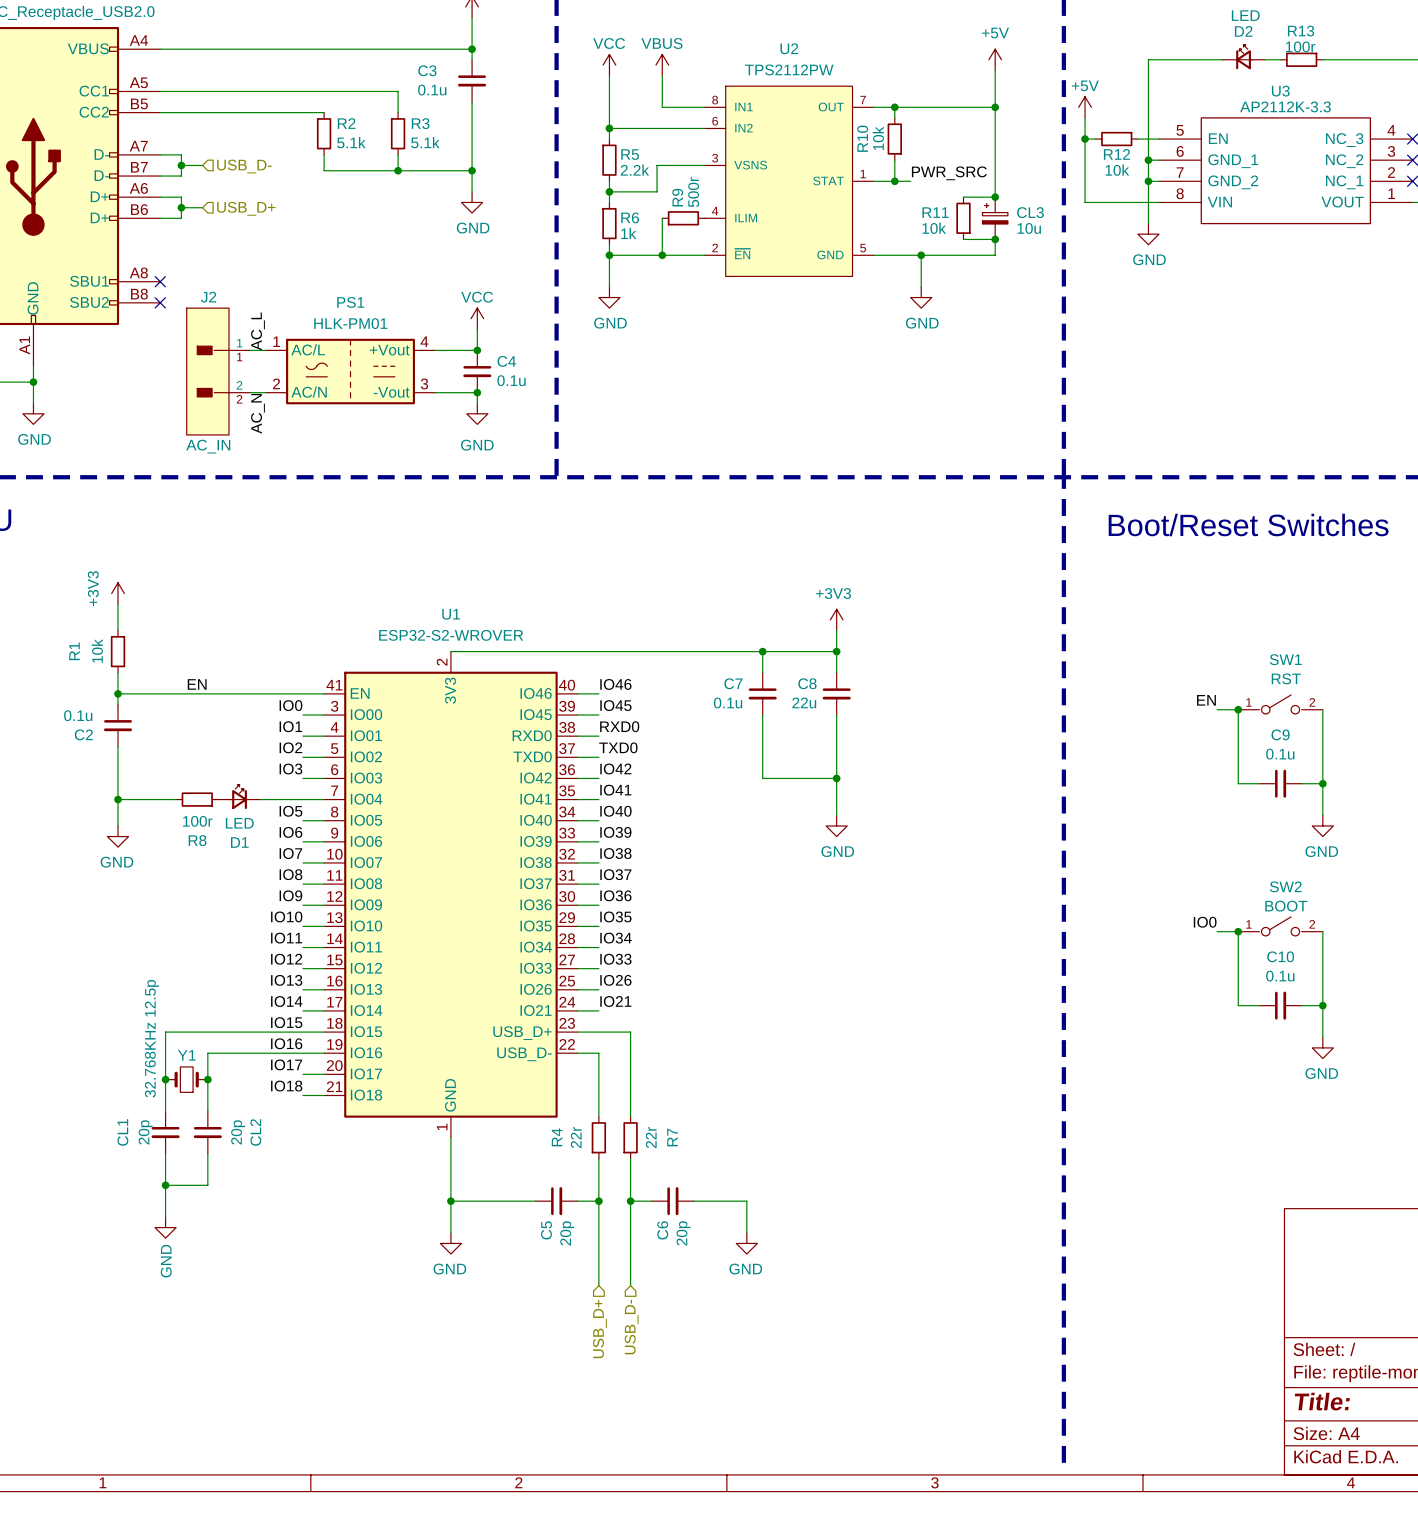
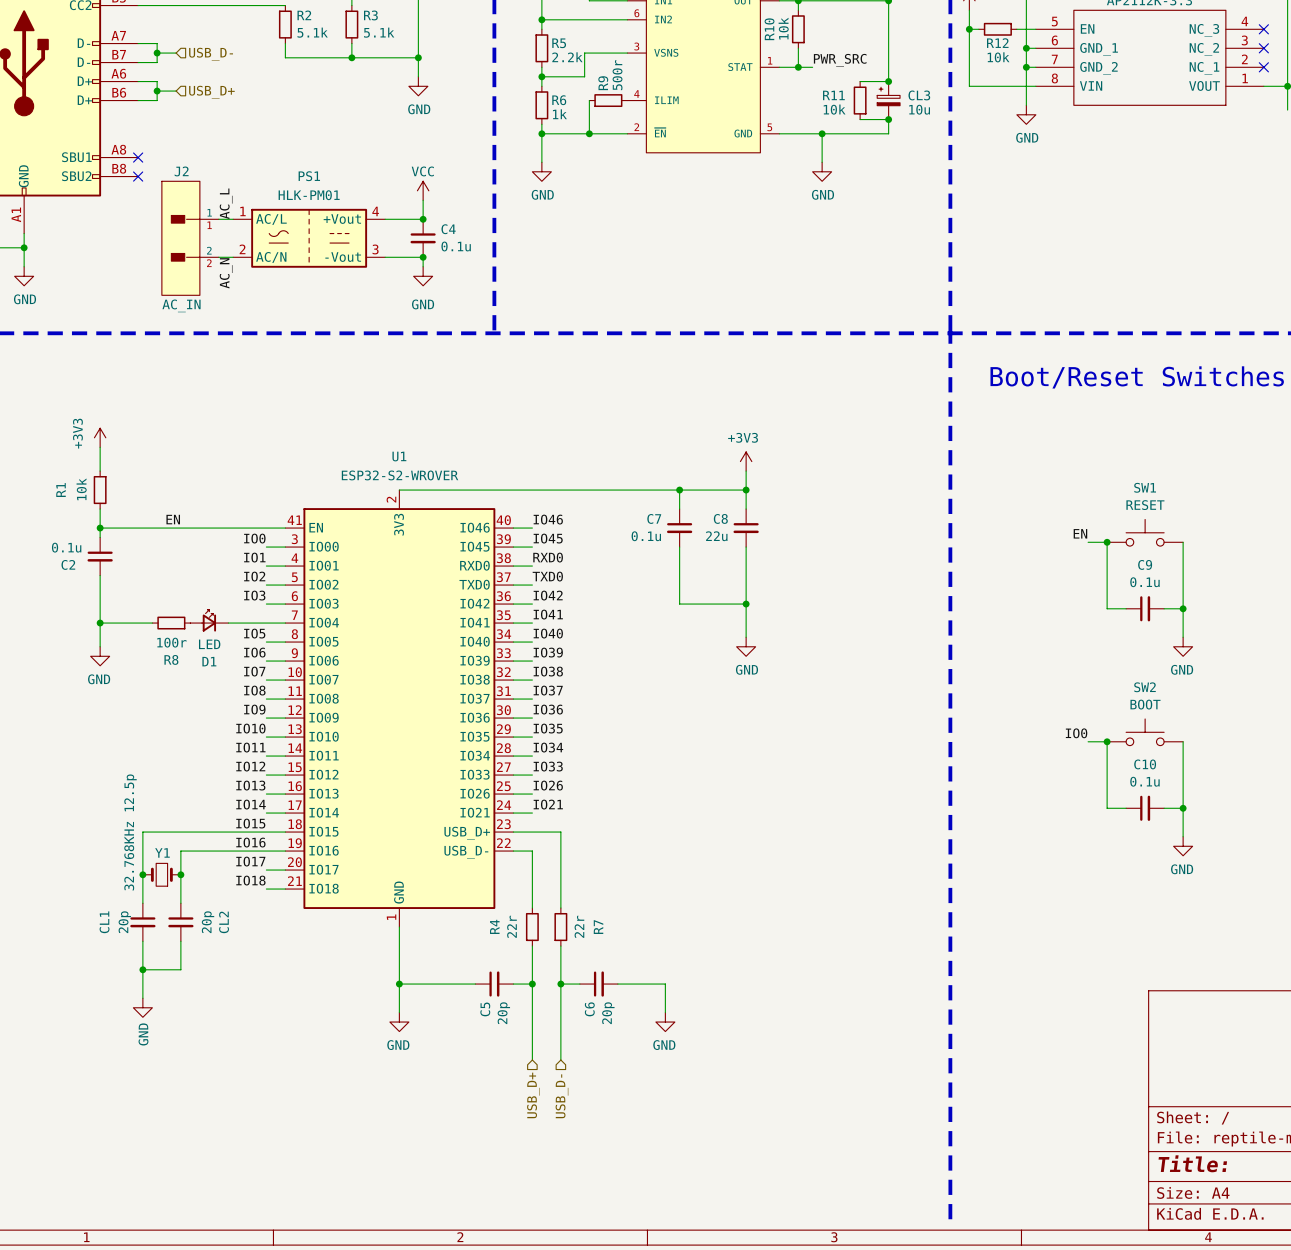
SW1 value: RST (1286, 678) -> RESET (1145, 505)
SW1 symbol: [1238, 694, 1323, 714] -> [1107, 519, 1184, 547]
SW2 symbol: [1238, 916, 1323, 936] -> [1107, 718, 1184, 746]

